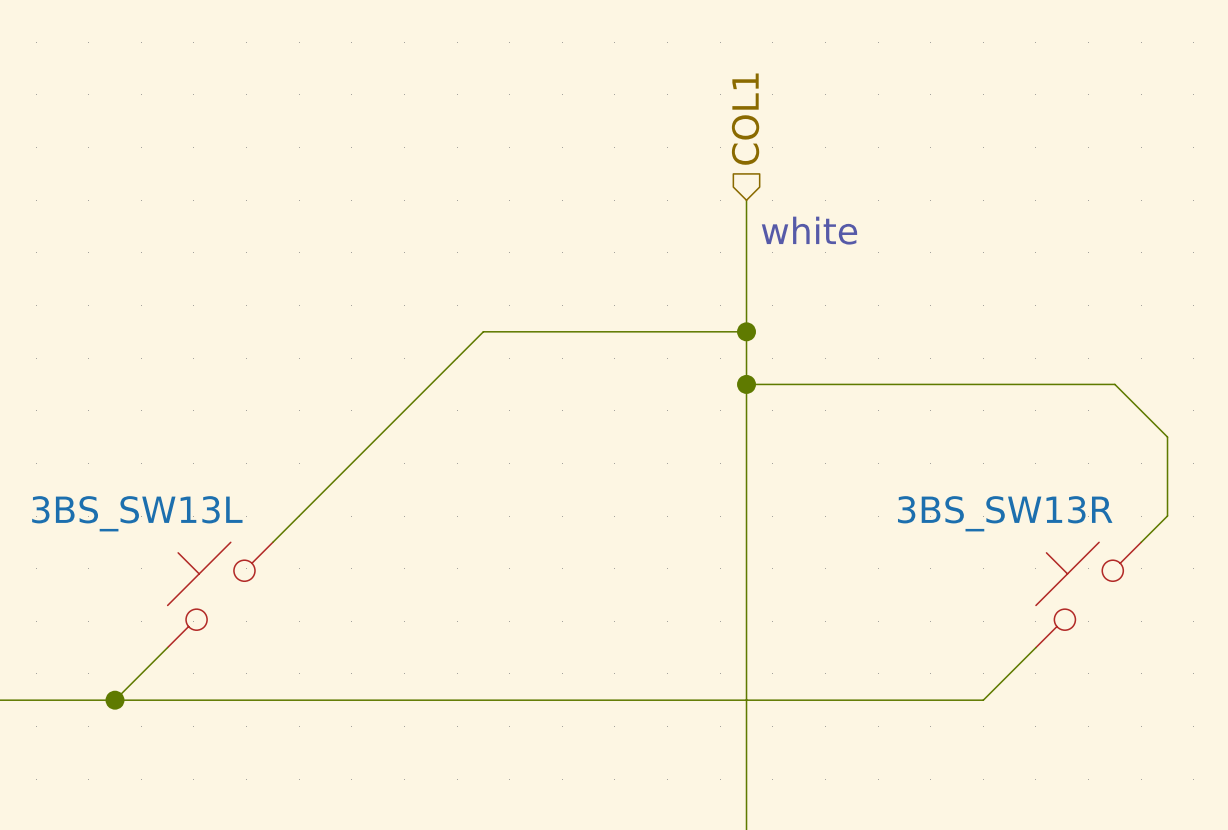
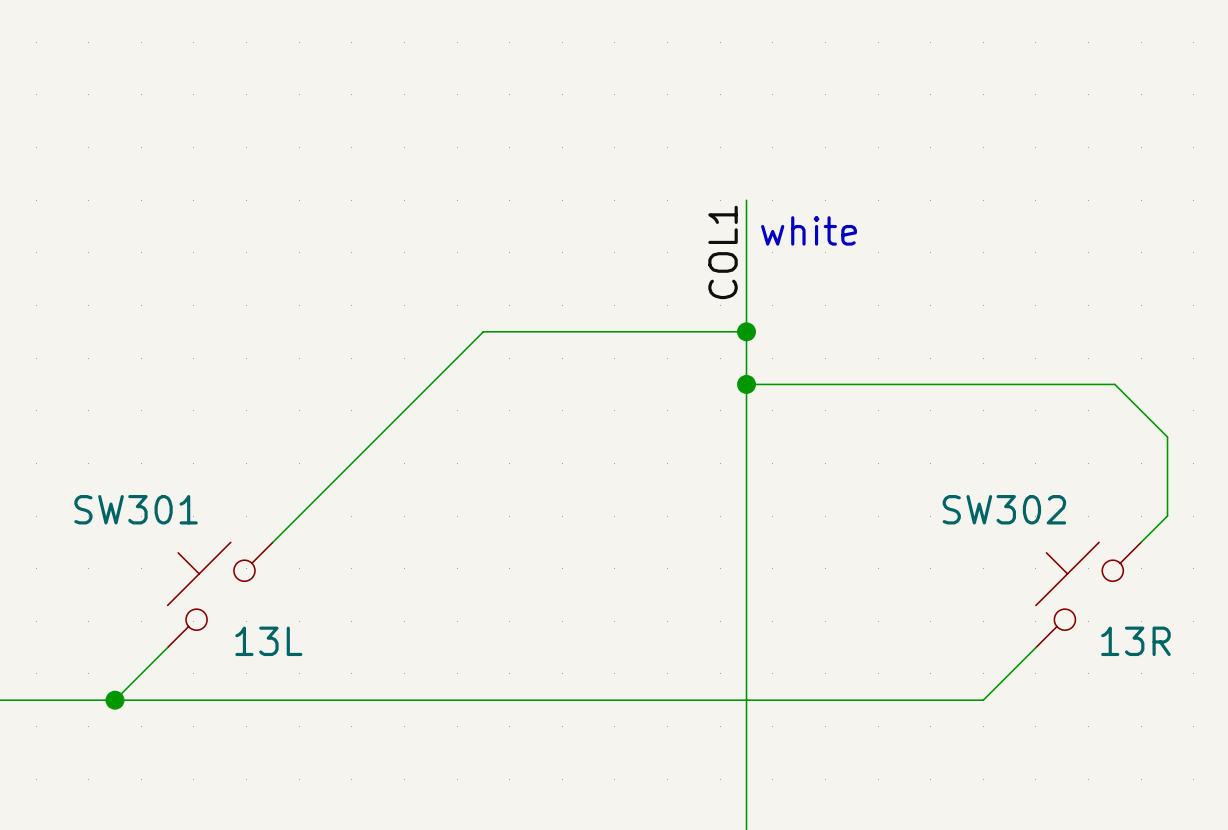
hierarchical label: COL1 (745, 119) -> none
label: none -> COL1 (723, 252)
3BS_SW13L name: 3BS_SW13L (137, 513) -> SW301 (136, 509)
3BS_SW13R name: 3BS_SW13R (1005, 513) -> SW302 (1004, 509)
3BS_SW13L value: none -> 13L (268, 641)
3BS_SW13R value: none -> 13R (1135, 641)

